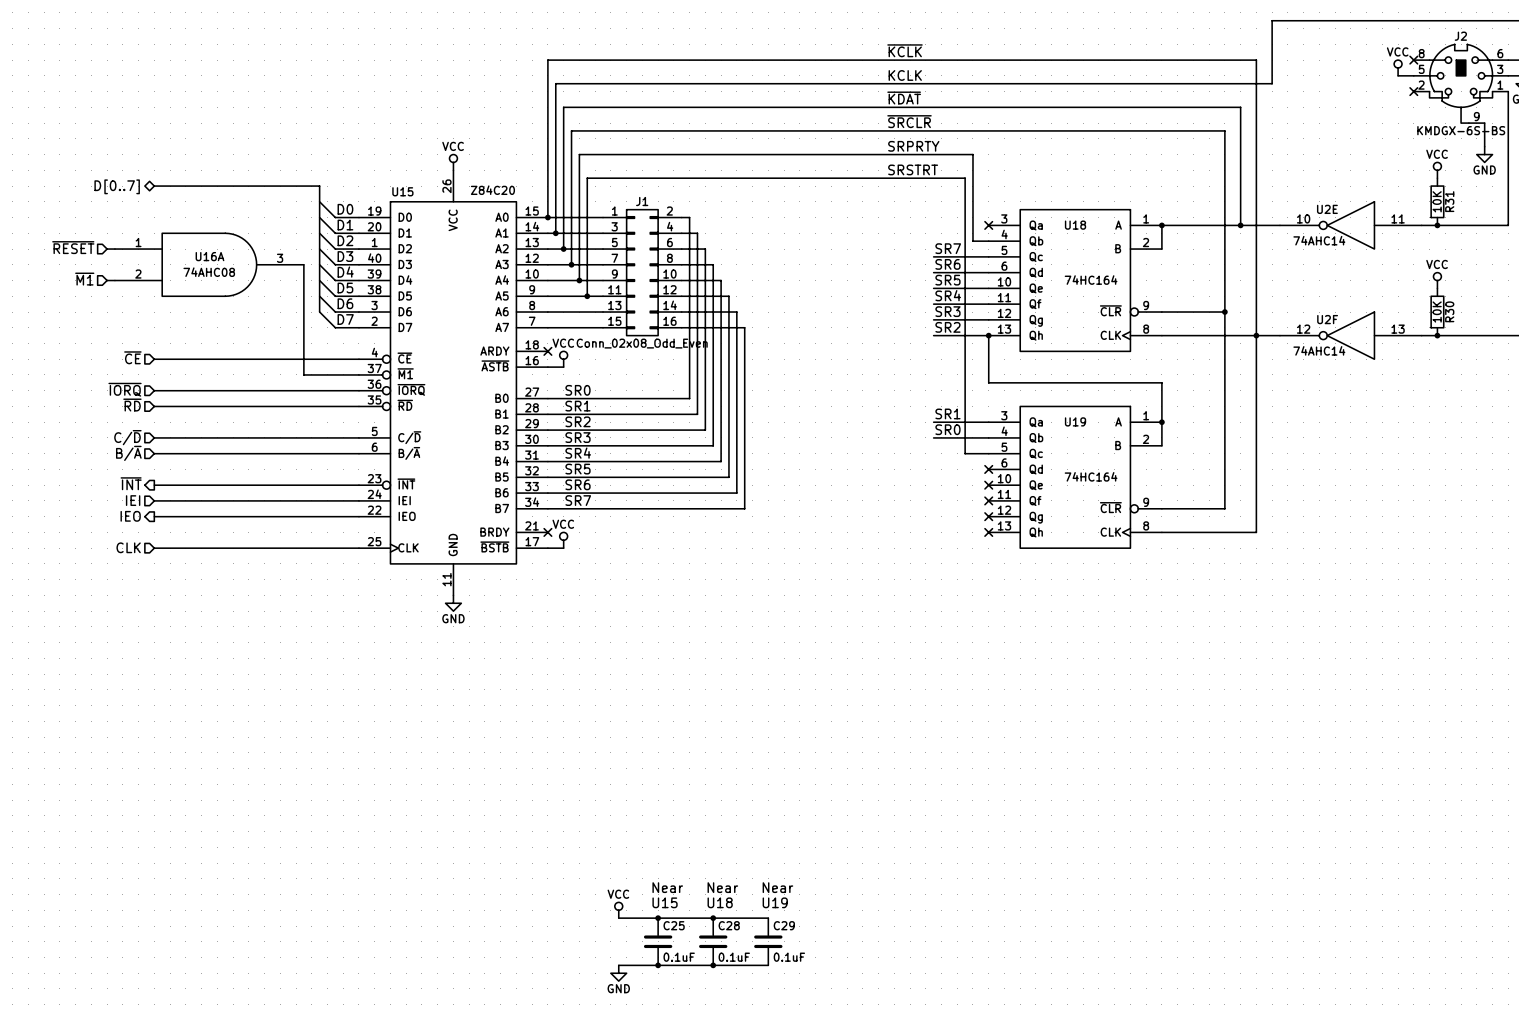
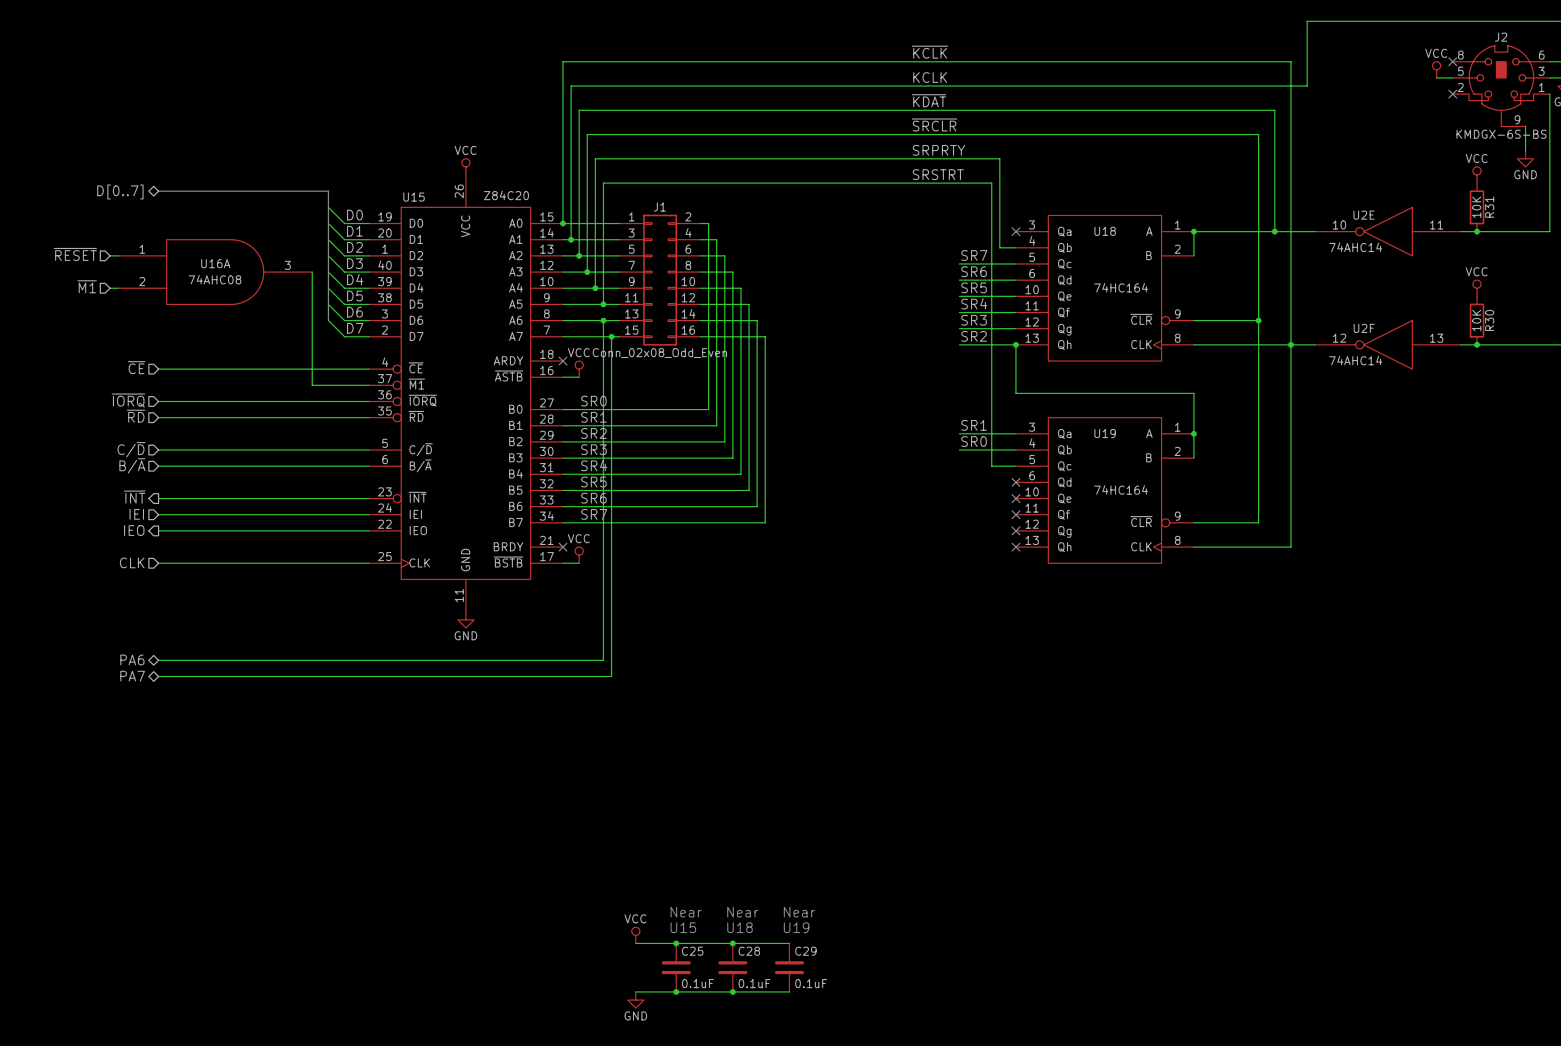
wire: none -> (603, 320) (603, 660) (158, 660)
junction: none -> (603, 320)
wire: none -> (611, 336) (611, 676) (158, 676)
junction: none -> (611, 336)
hierarchical label: none -> PA6 (132, 659)
hierarchical label: none -> PA7 (132, 676)

